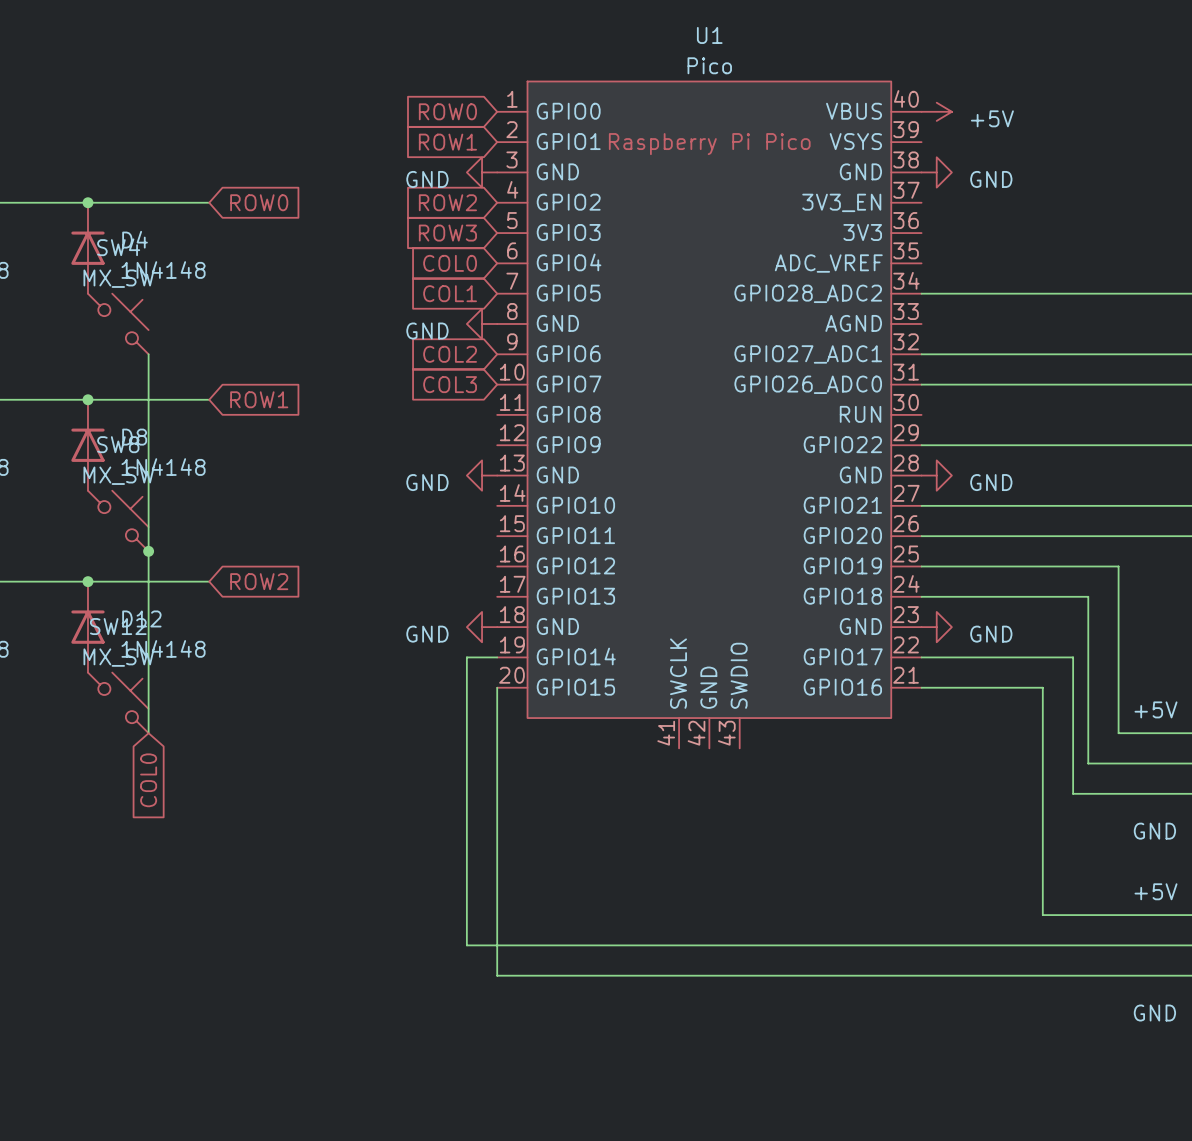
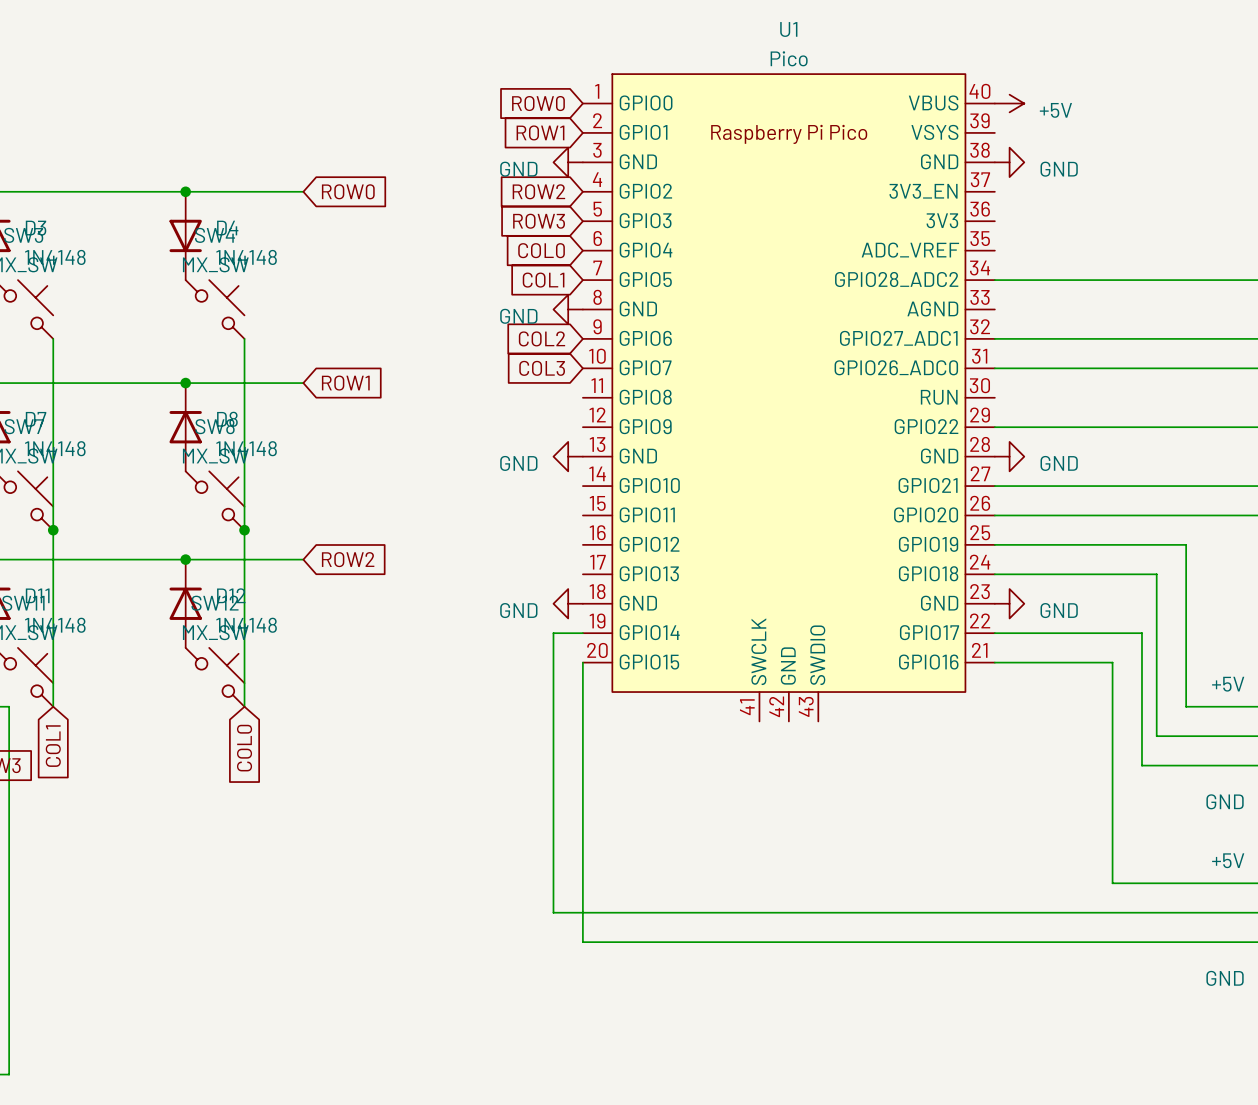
D4 rotation: 0° (87, 248) -> 180° (185, 235)

